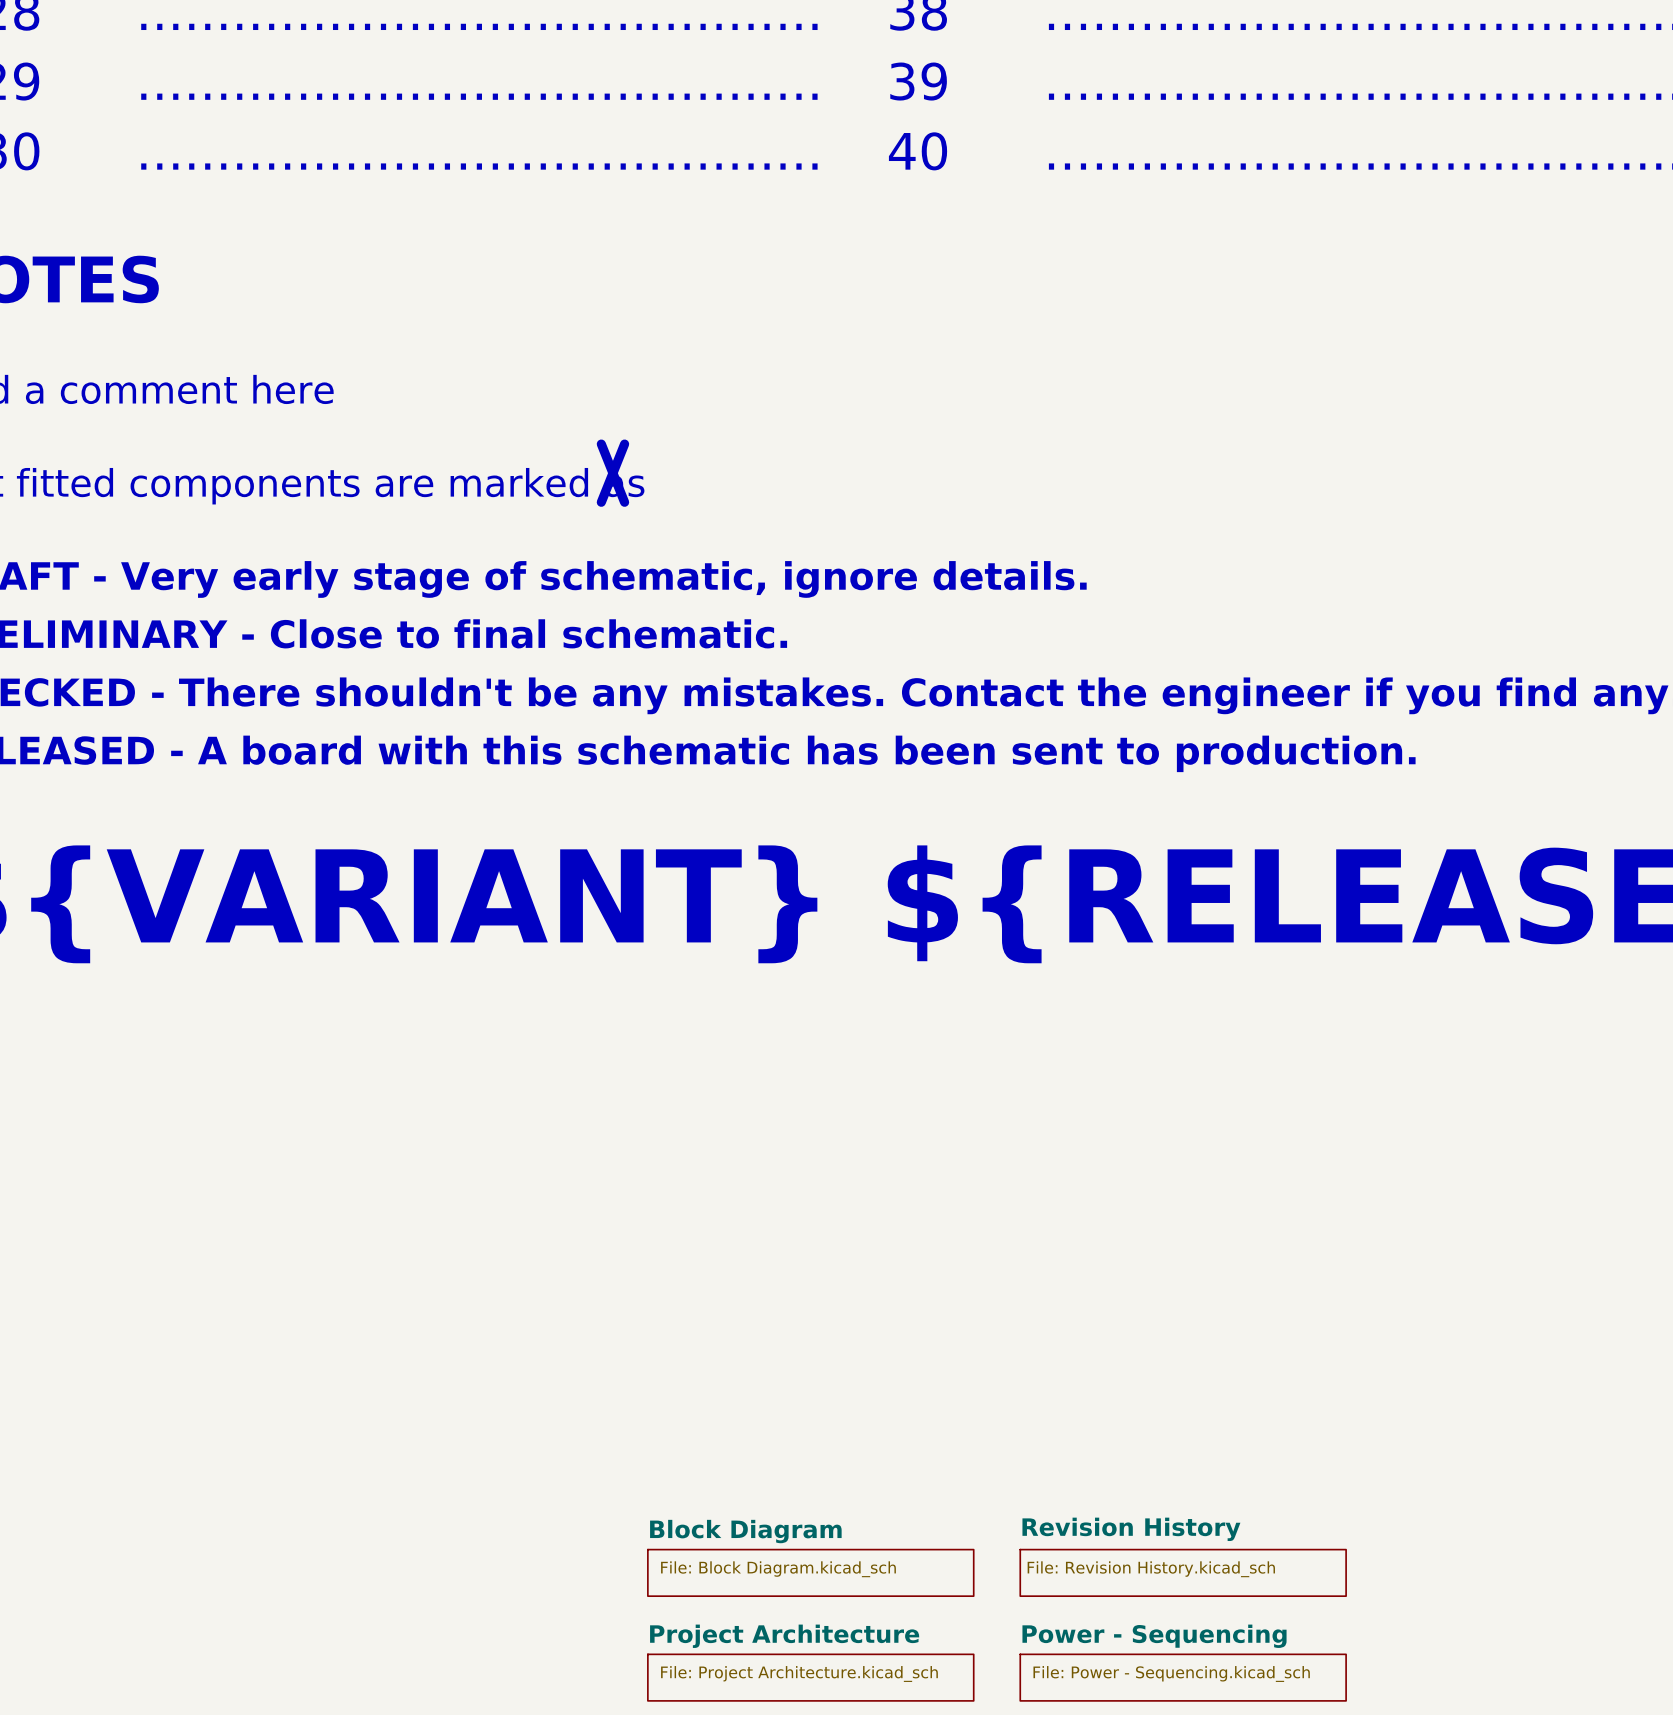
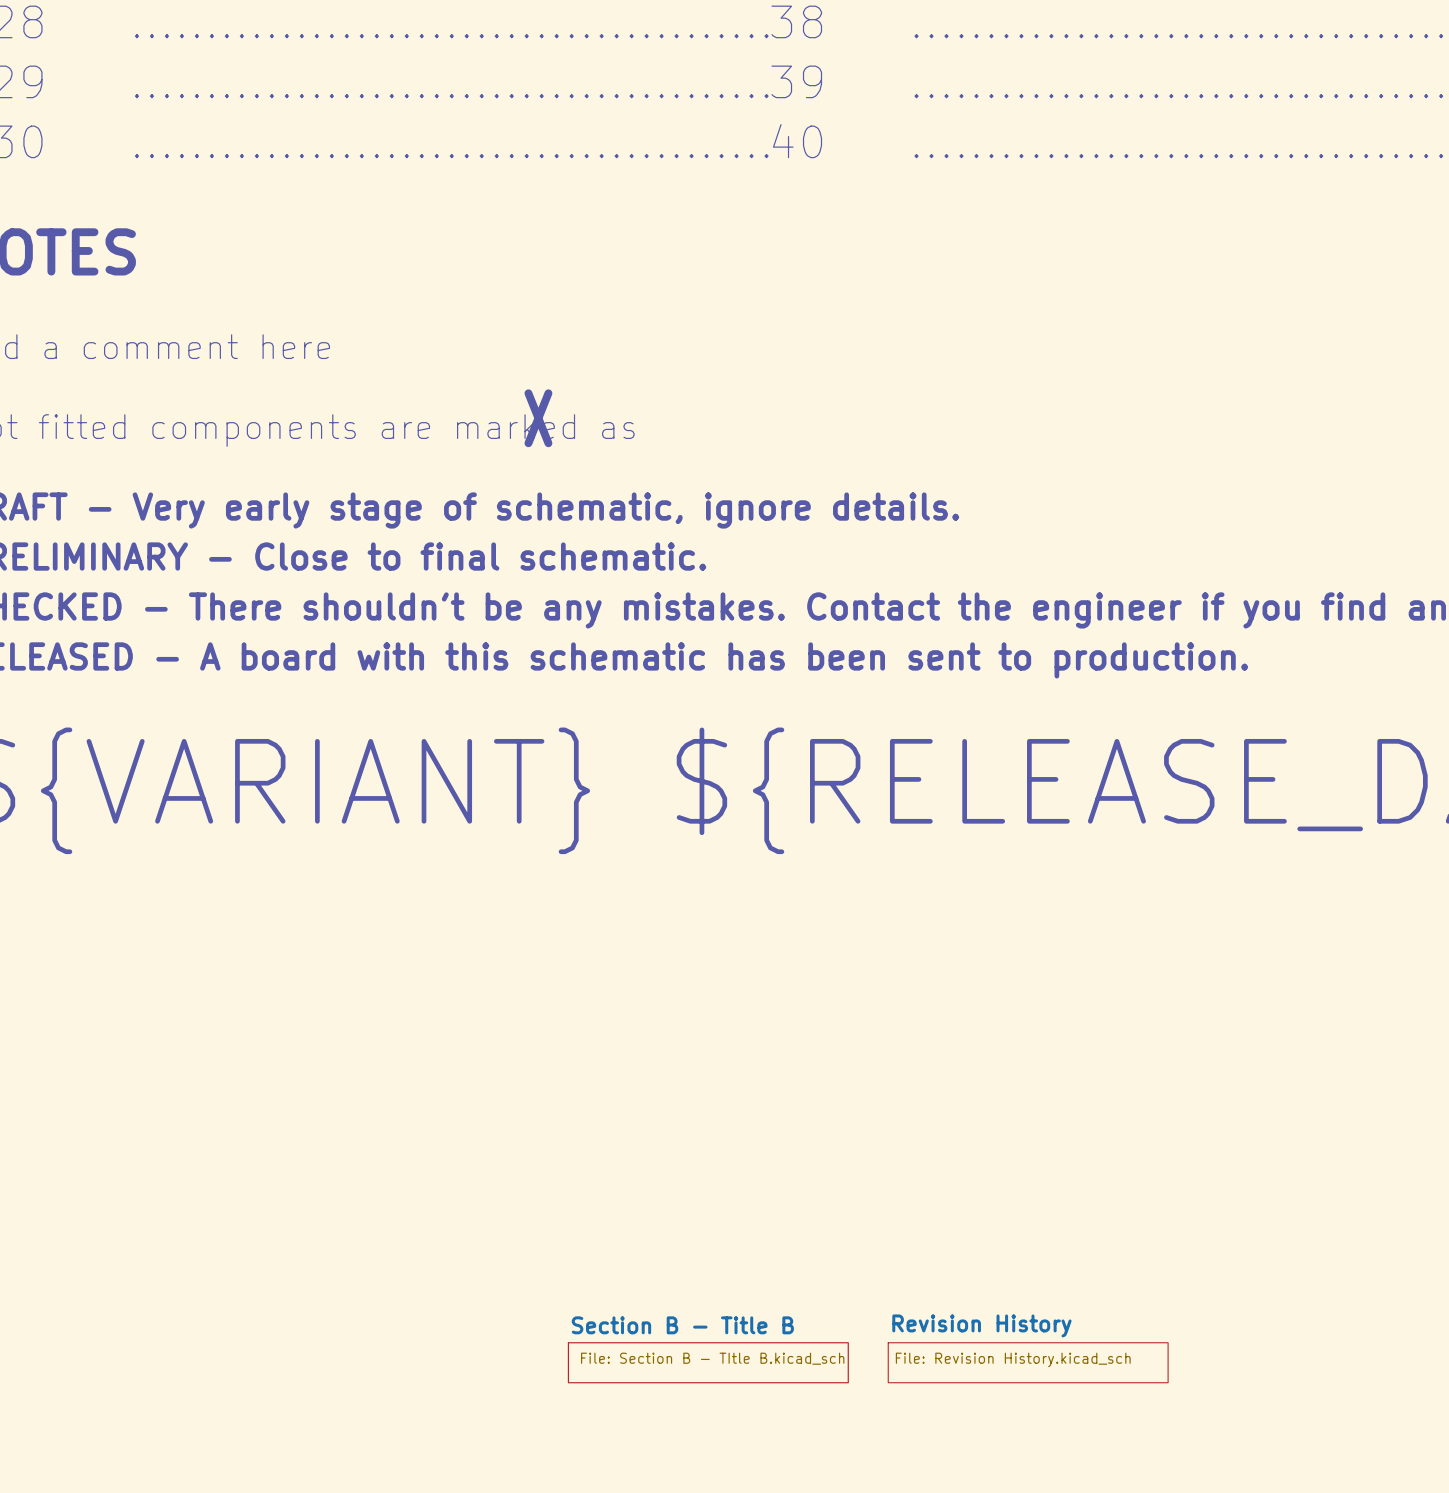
sheet Block Diagram name: Block Diagram (745, 1531) -> Section B - Title B (682, 1325)
sheet Block Diagram value: File: Block Diagram.kicad_sch (778, 1569) -> File: Section B - TItle B.kicad_sch (712, 1358)
sheet Project Architecture: File: Project Architecture.kicad_sch (810, 1677) -> none
sheet Power - Sequencing: File: Power - Sequencing.kicad_sch (1183, 1677) -> none

